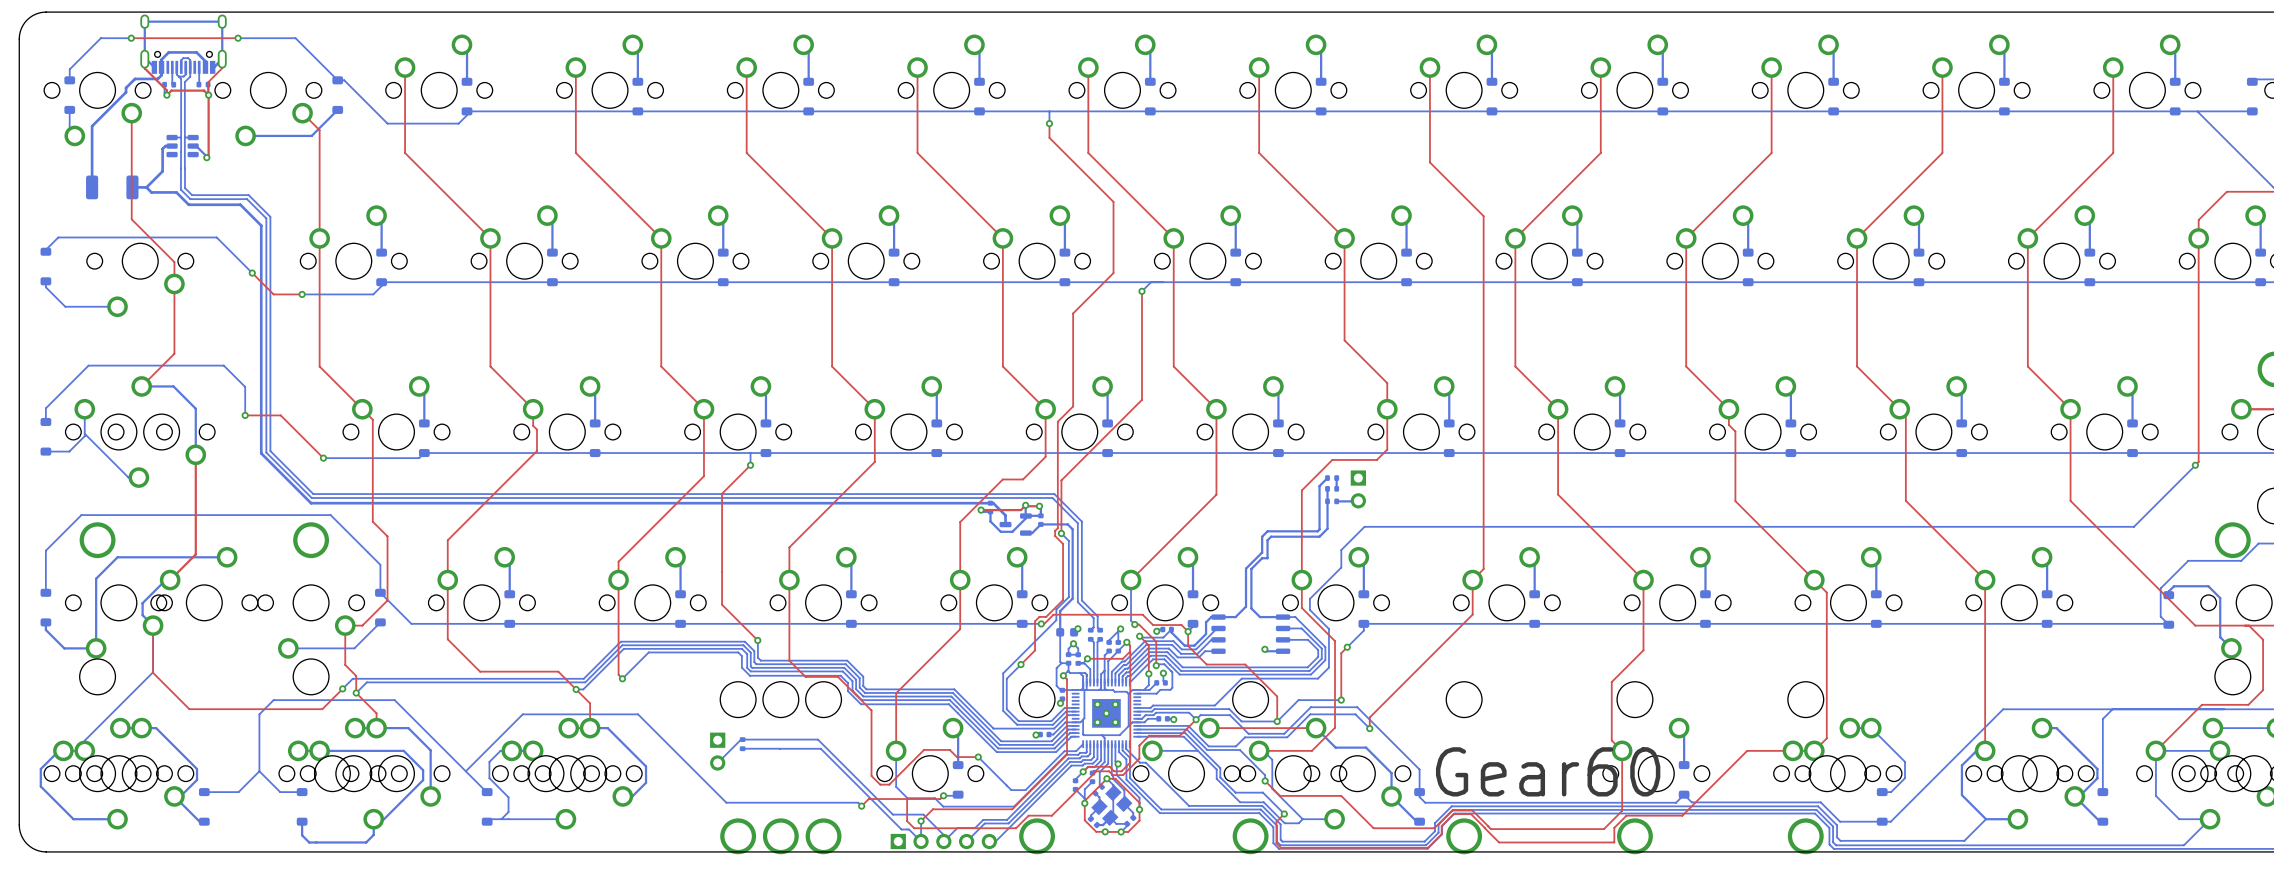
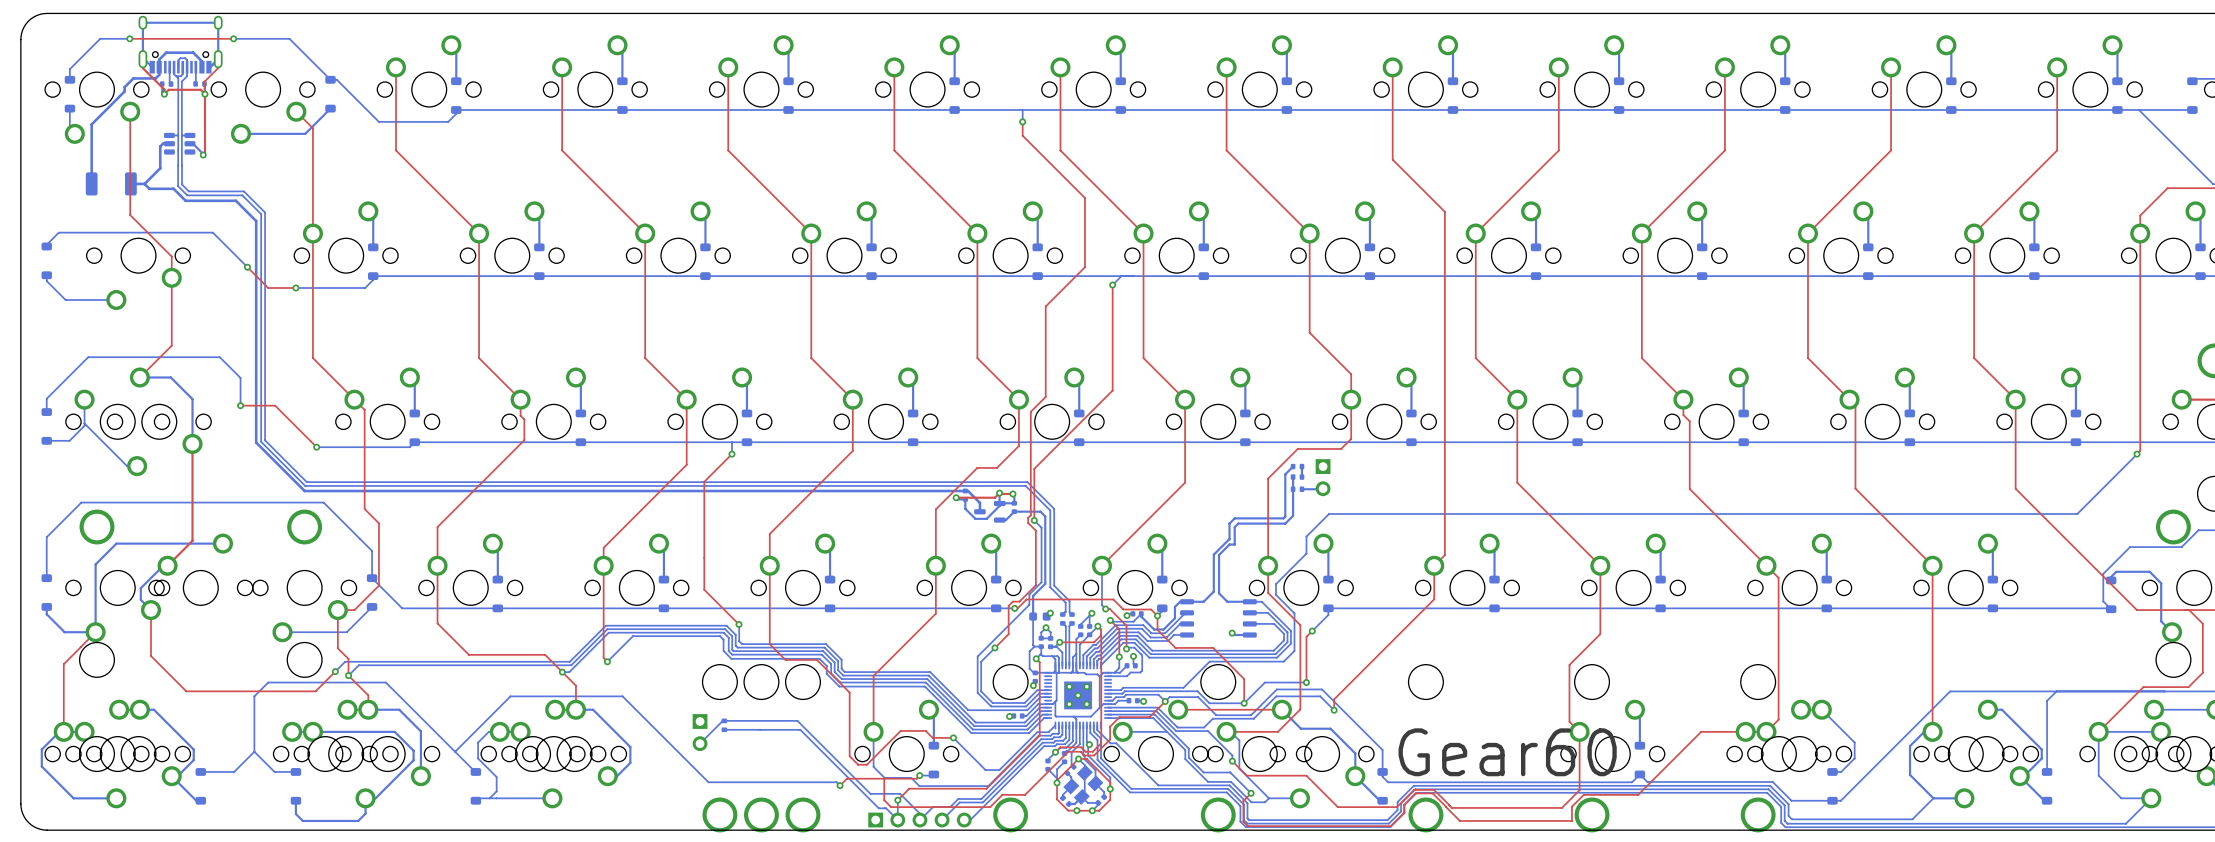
bottom track: (153, 625) (153, 672) (84, 740) (84, 750) -> none
top track: none -> (95, 632) (80, 647)
top track: none -> (80, 647) (63, 664) (63, 731)

